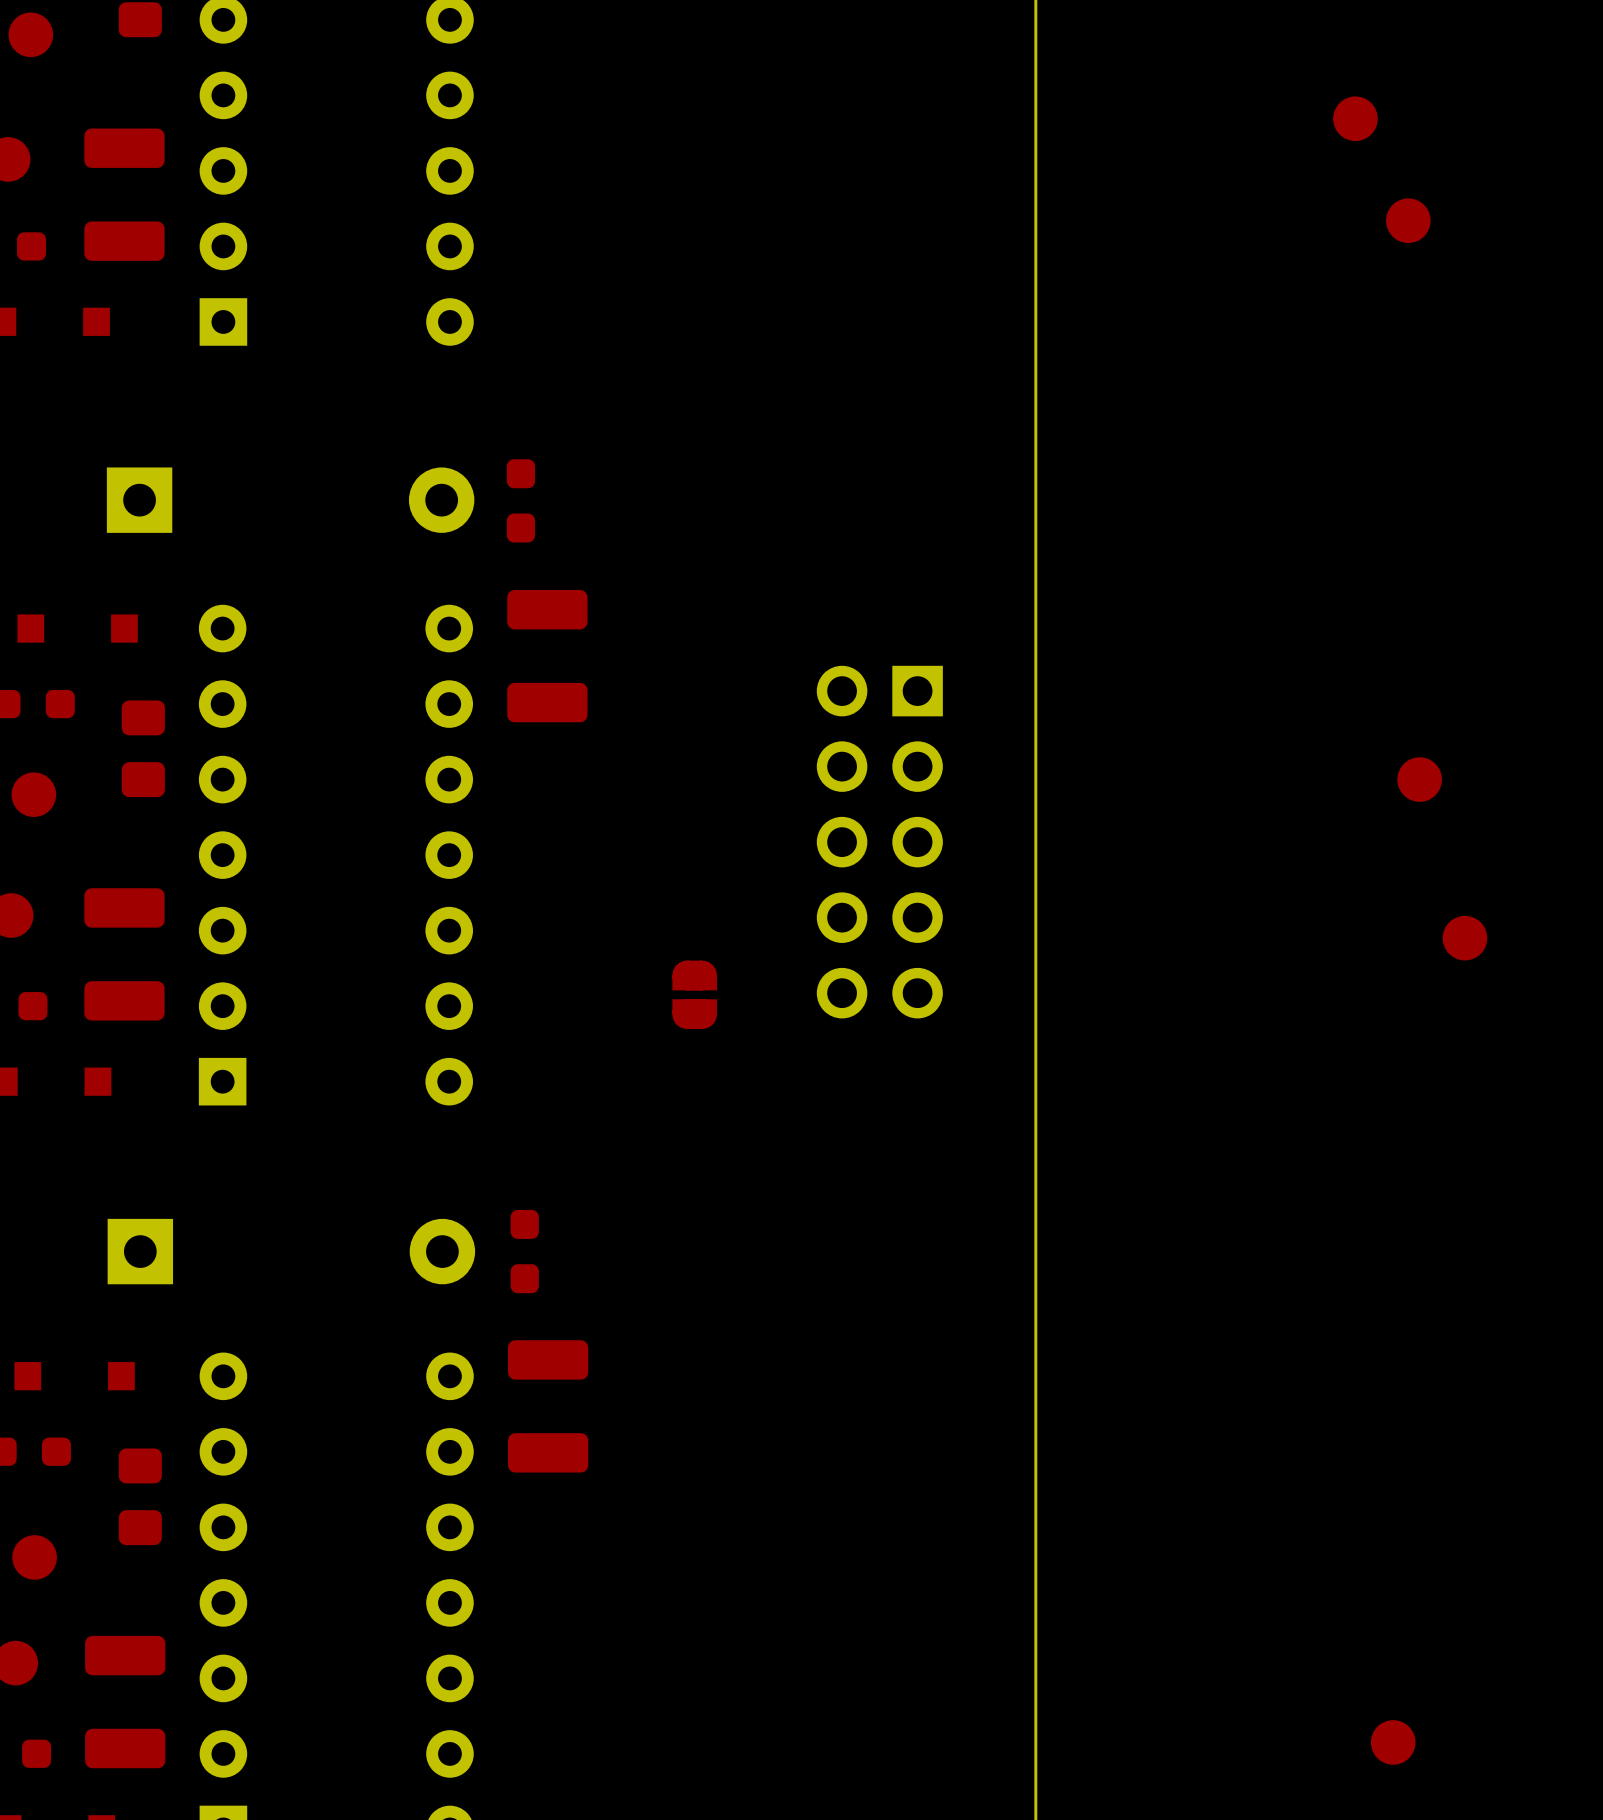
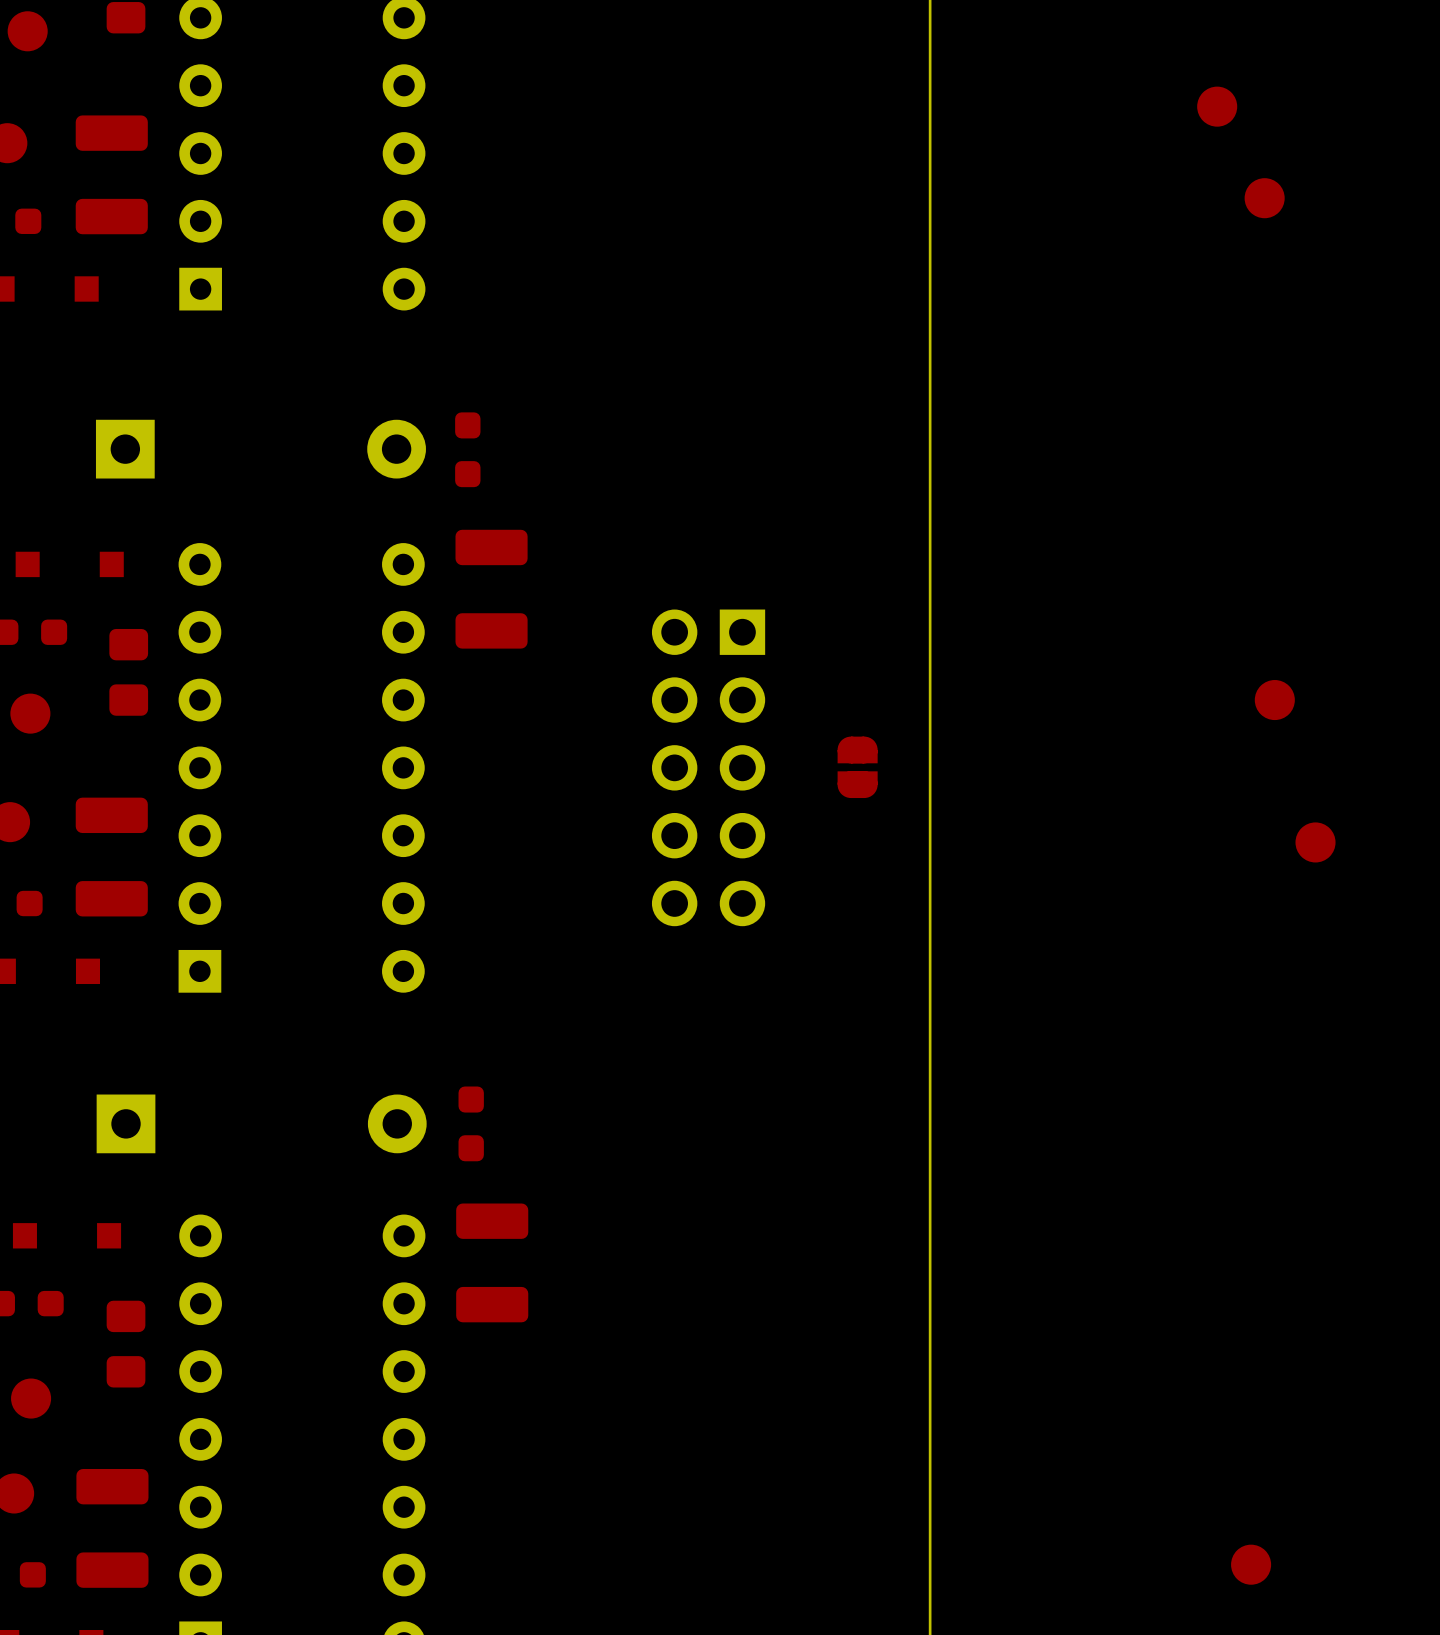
part position: (879, 842) -> (708, 767)
part position: (694, 994) -> (857, 767)

